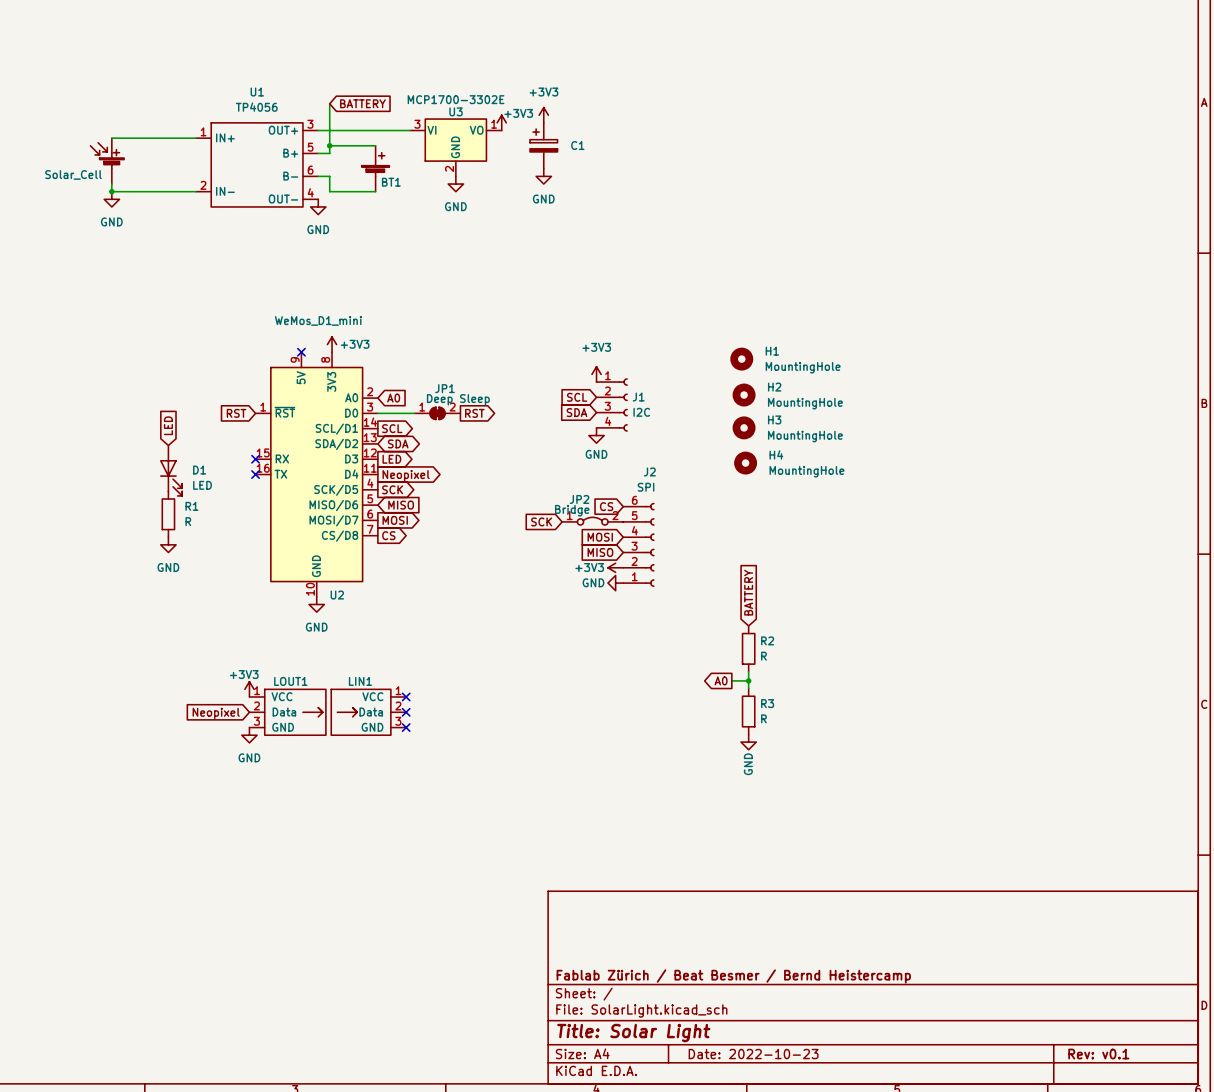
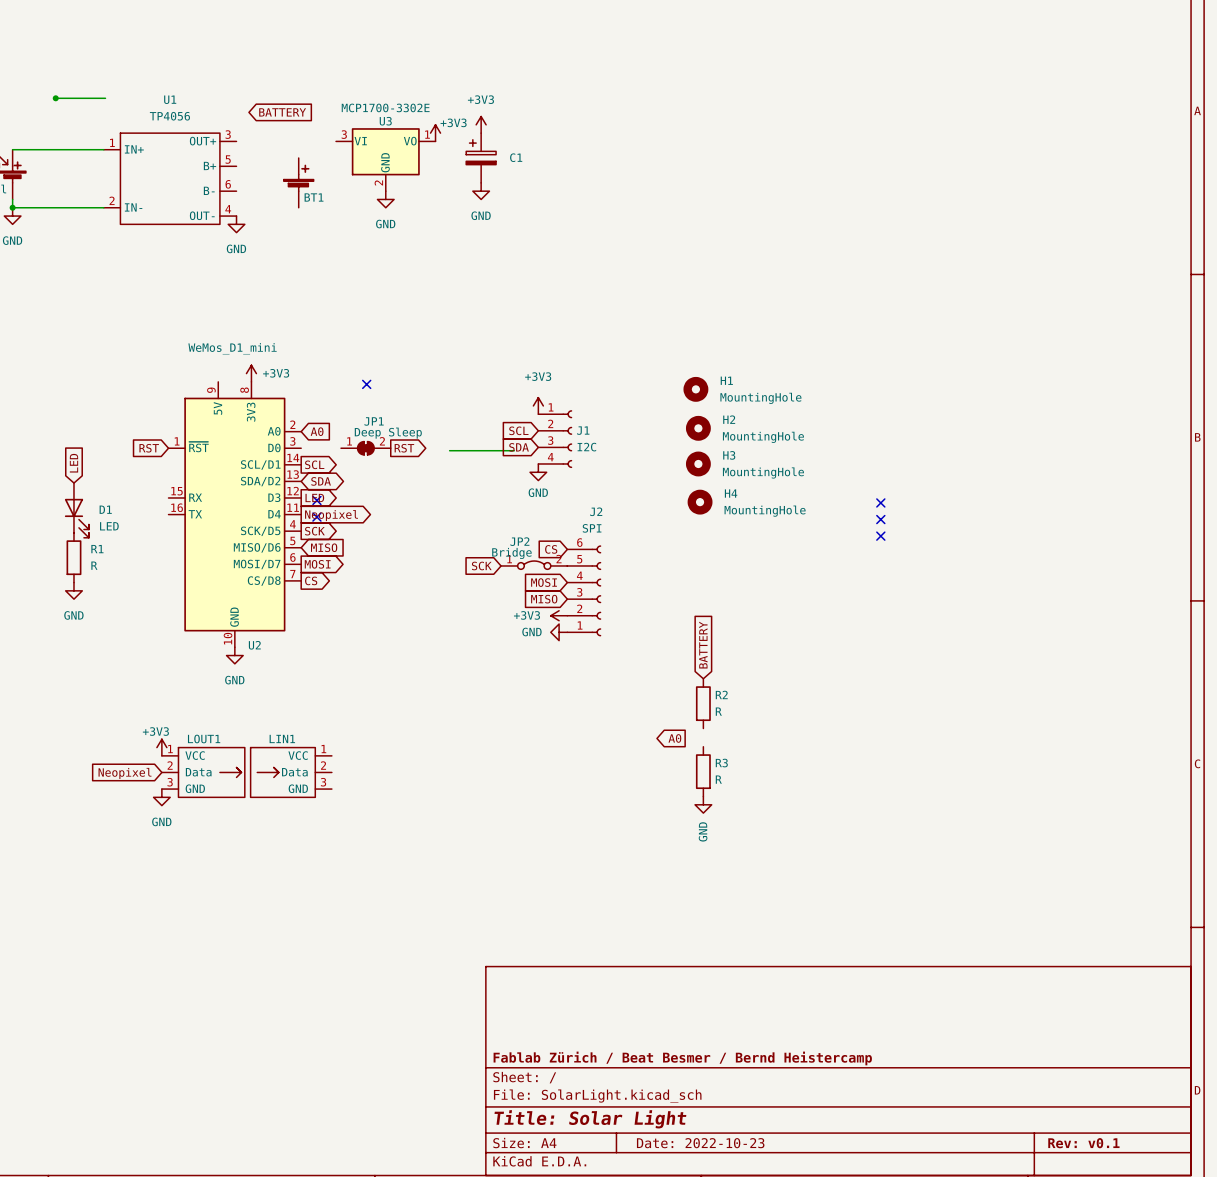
wire: none -> (55, 98) (105, 98)
junction: none -> (55, 98)
wire: (329, 103) (329, 153) (318, 153) -> none
wire: (318, 130) (409, 130) -> none
wire: (329, 145) (375, 145) -> none
junction: (329, 145) -> none
wire: (318, 176) (329, 176) (329, 191) (375, 191) -> none
no-connect mark: (301, 352) -> none
no-connect mark: none -> (366, 384)
wire: (377, 413) (414, 413) -> none
wire: none -> (449, 450) (514, 450)
no-connect mark: (255, 459) -> none
no-connect mark: none -> (316, 500)
no-connect mark: none -> (880, 502)
no-connect mark: (255, 474) -> none
no-connect mark: none -> (316, 517)
no-connect mark: none -> (880, 519)
no-connect mark: none -> (880, 536)
wire: (748, 671) (748, 688) -> none
wire: (731, 680) (748, 680) -> none
junction: (748, 680) -> none
no-connect mark: (406, 696) -> none
no-connect mark: (406, 712) -> none
no-connect mark: (406, 727) -> none

